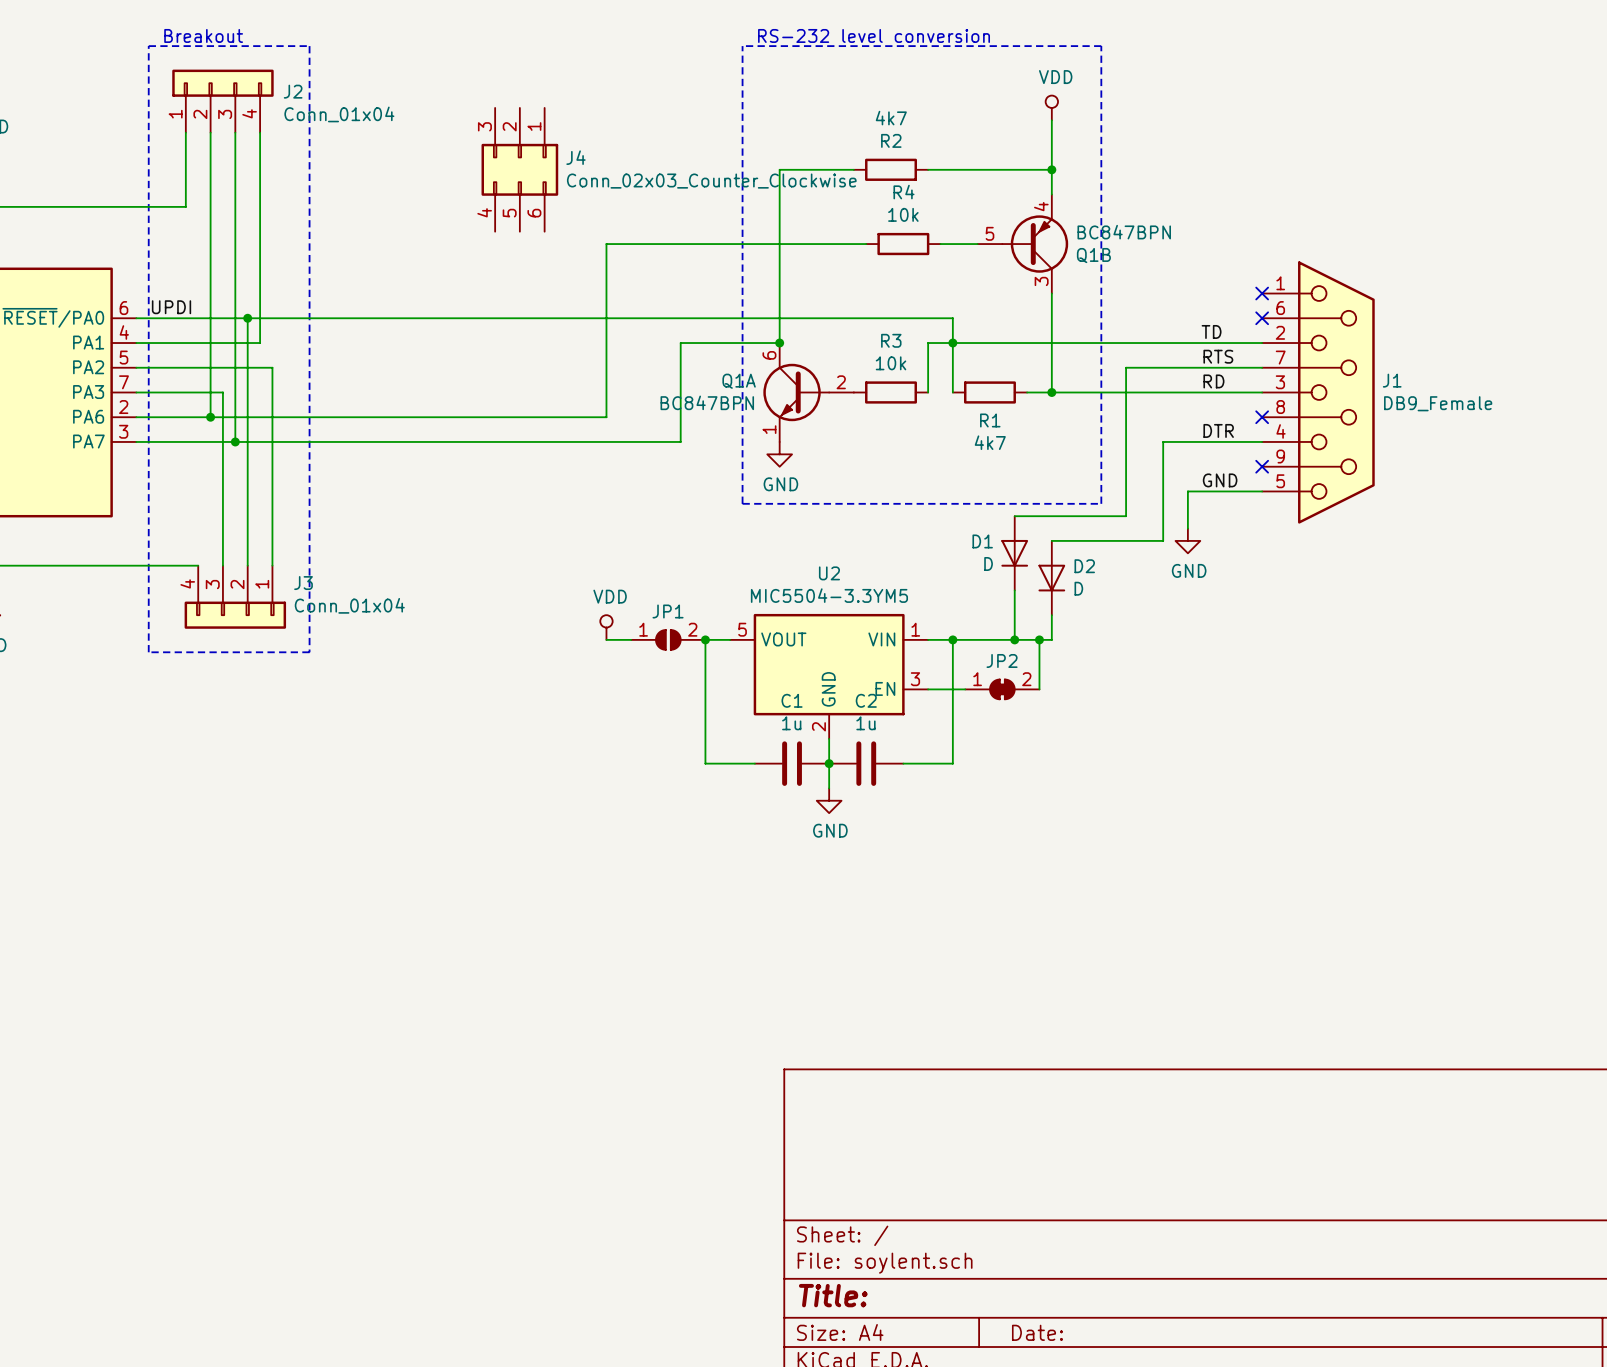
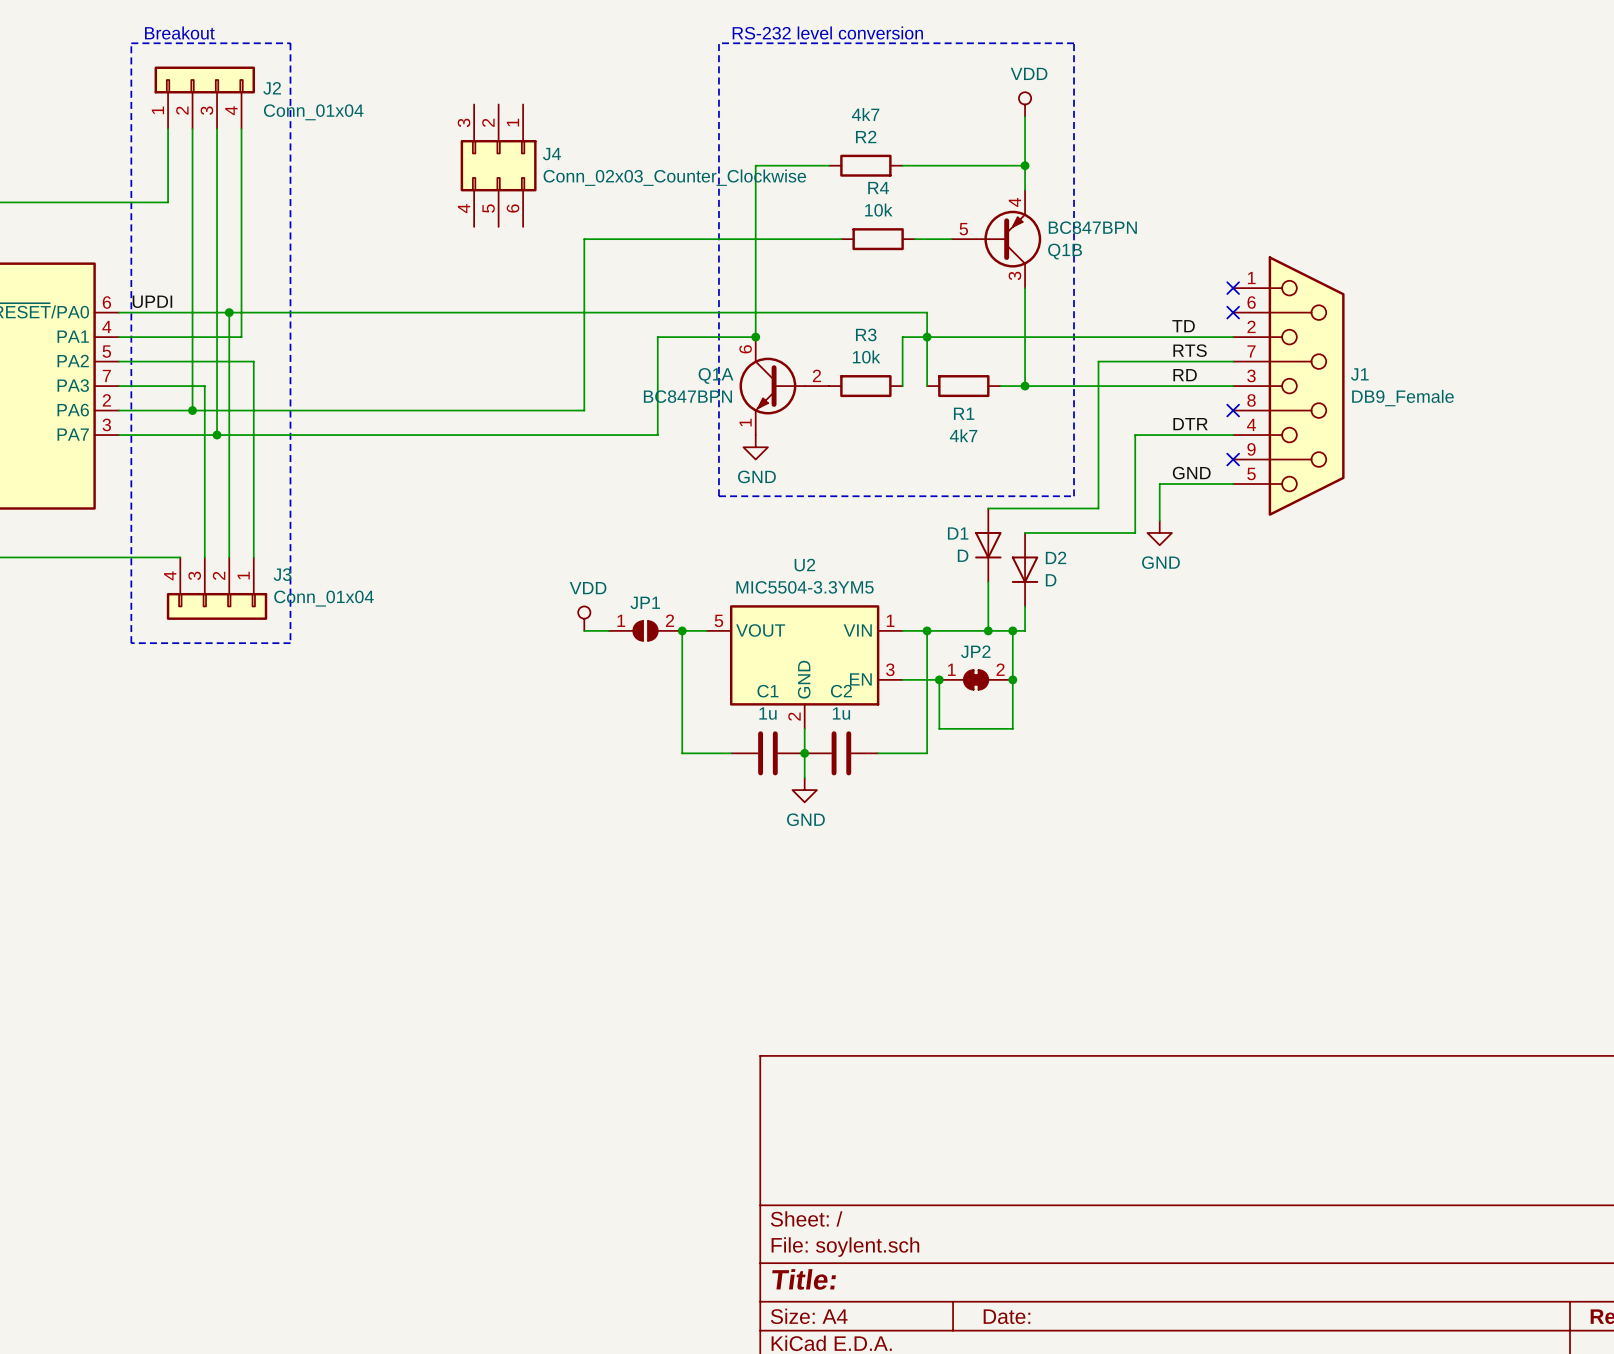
wire: none -> (939, 679) (939, 728) (1012, 728) (1012, 679)
junction: none -> (939, 679)
junction: none -> (1012, 679)

